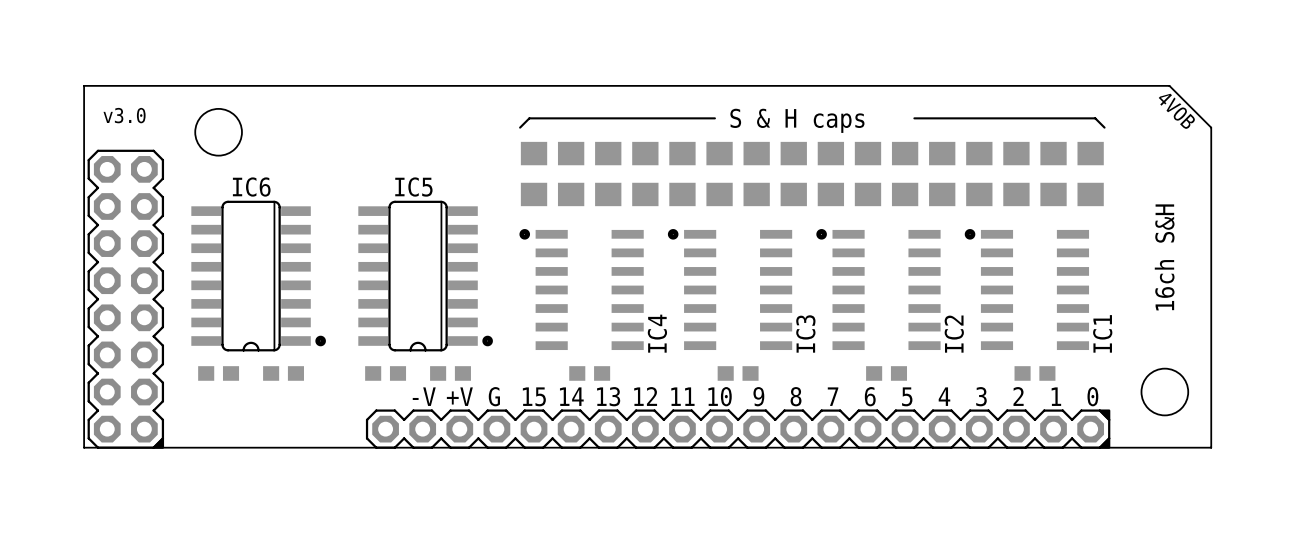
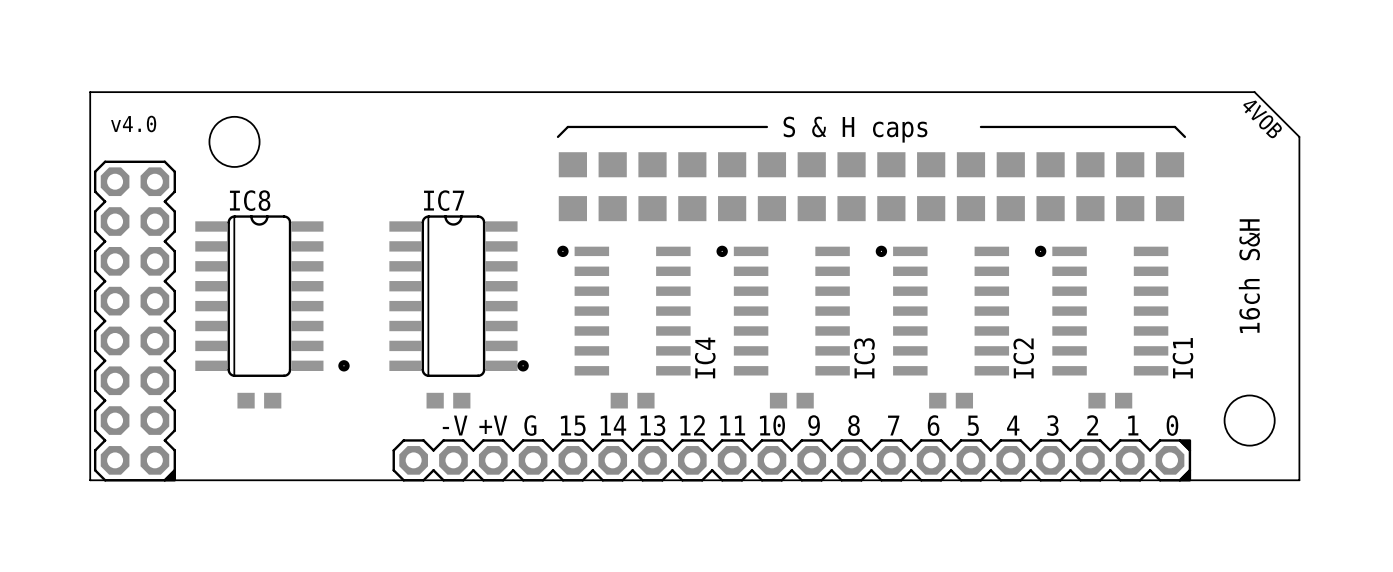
text: v3.0 (124, 115) -> v4.0 (133, 123)
IC8: none -> (259, 296)
IC6: (251, 276) -> none
IC5: (418, 276) -> none
IC7: none -> (453, 296)
part: (218, 373) -> none
part: none -> (259, 400)
part: (283, 373) -> none
part: (385, 373) -> none
part: none -> (448, 400)
part: (450, 373) -> none

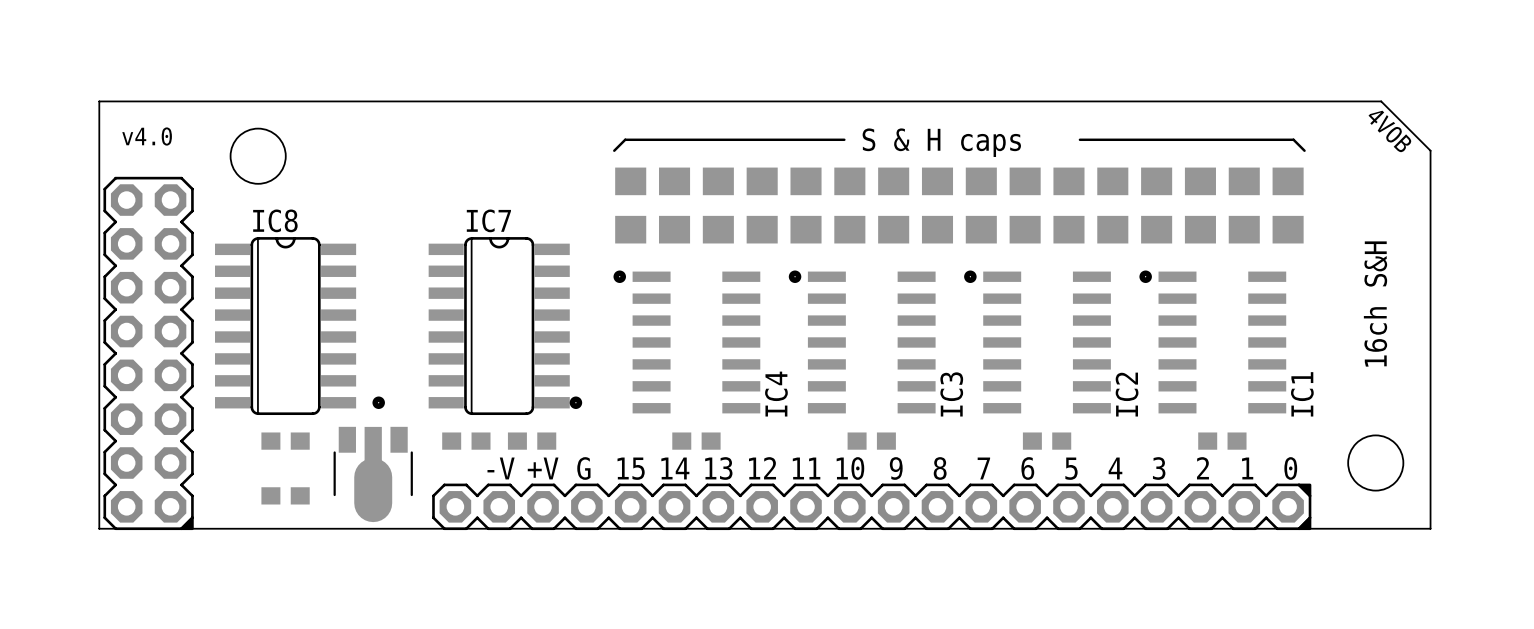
part: none -> (466, 441)
part: (448, 400) -> none
part: none -> (532, 441)
part: none -> (373, 474)
part: none -> (285, 495)

